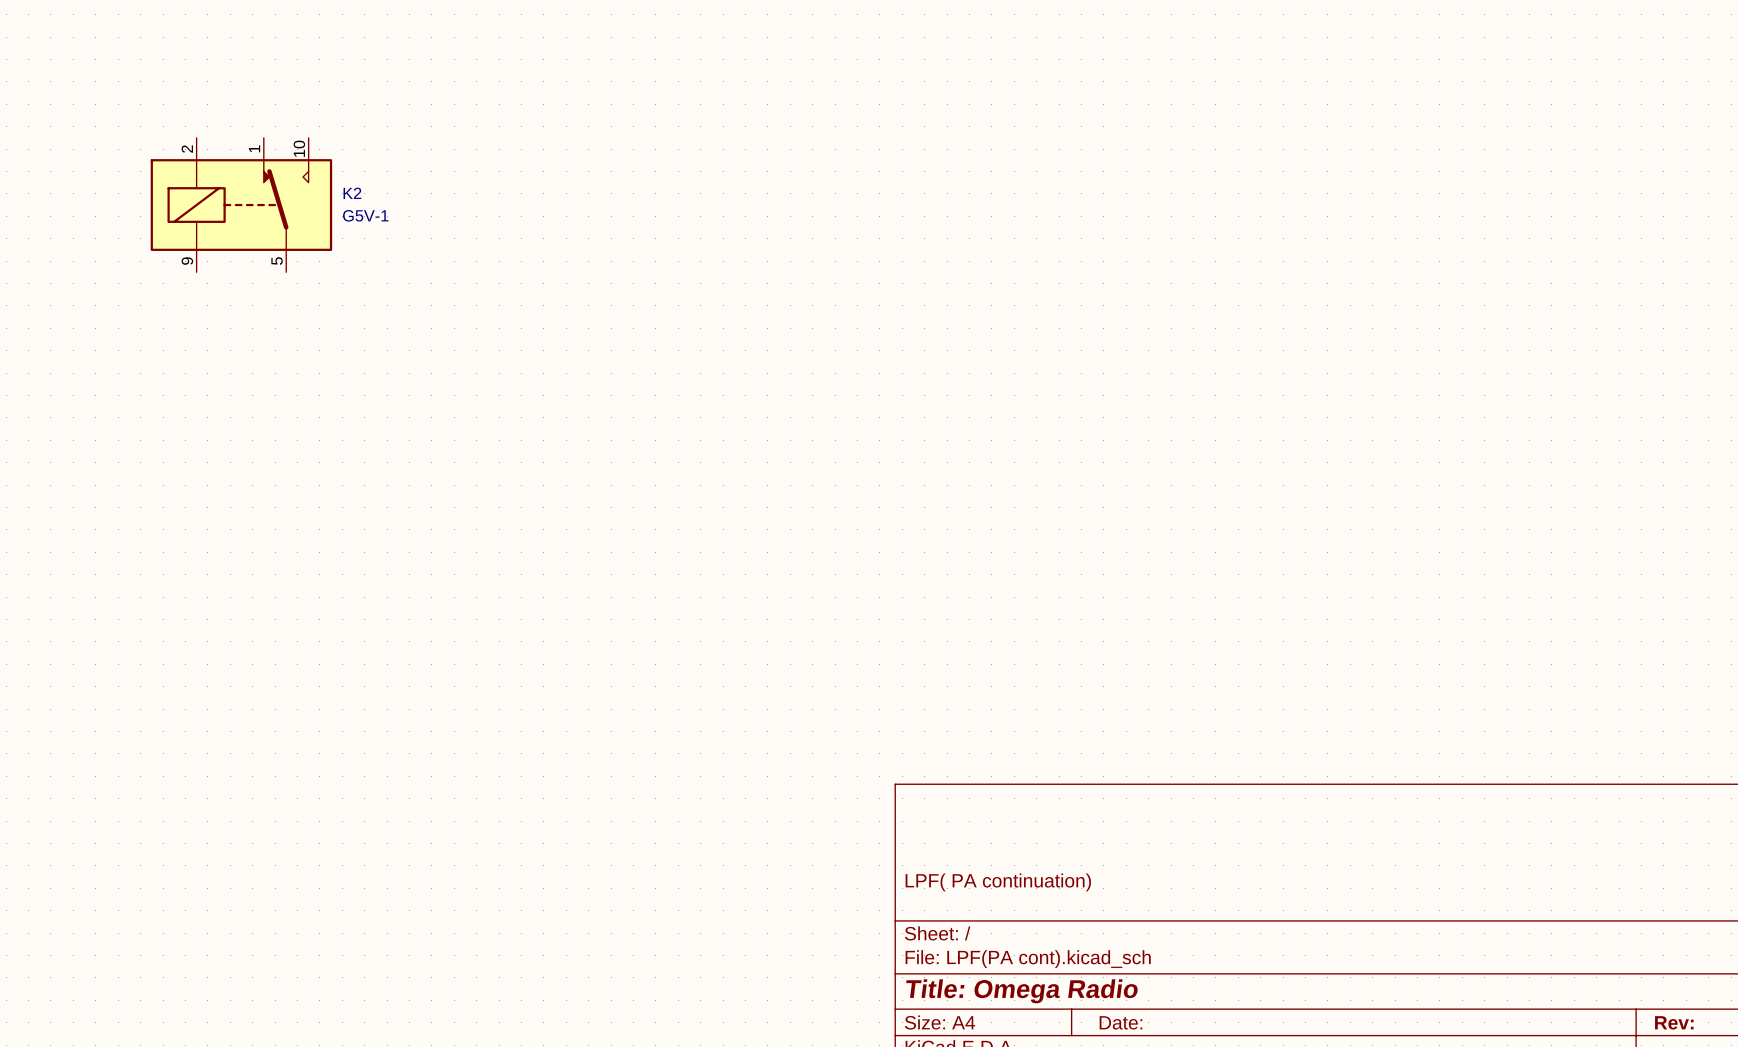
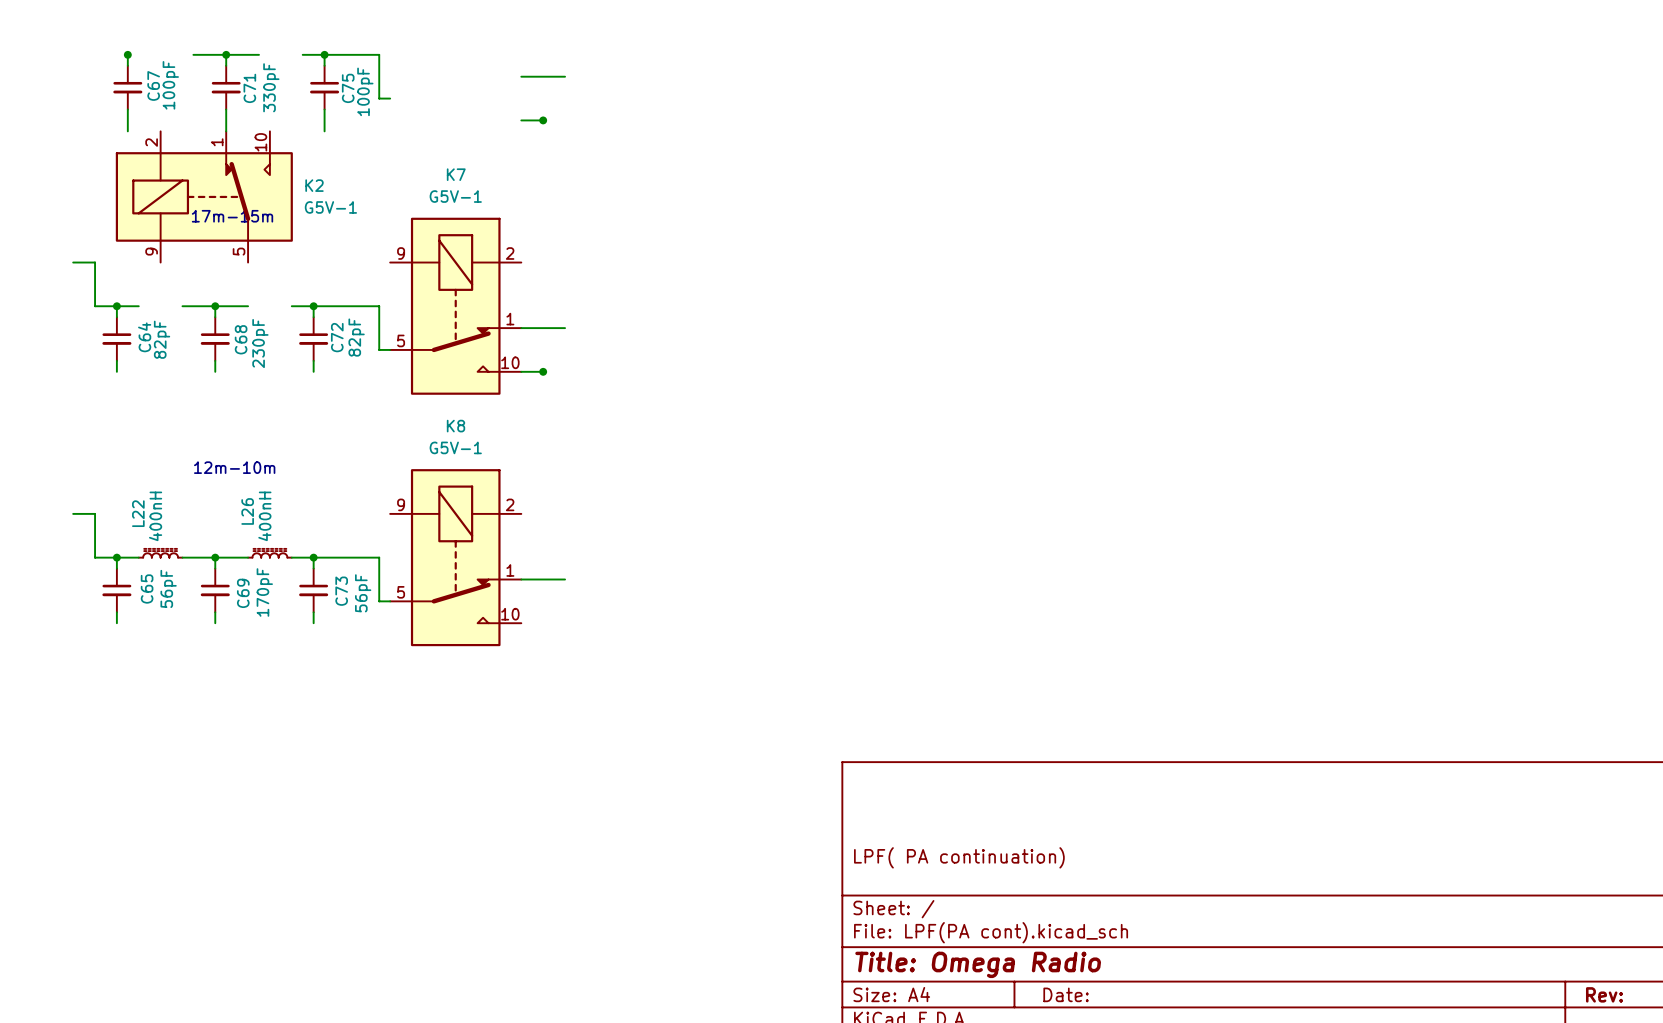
wire: none -> (127, 54) (127, 65)
junction: none -> (127, 54)
wire: none -> (193, 54) (258, 54)
wire: none -> (226, 54) (226, 65)
junction: none -> (226, 54)
wire: none -> (302, 54) (379, 54) (379, 98) (390, 98)
wire: none -> (324, 54) (324, 65)
junction: none -> (324, 54)
wire: none -> (521, 76) (565, 76)
C67: none -> 100pF (127, 87)
C71: none -> 330pF (226, 87)
C75: none -> 100pF (324, 87)
wire: none -> (127, 109) (127, 131)
wire: none -> (226, 109) (226, 131)
wire: none -> (324, 109) (324, 131)
wire: none -> (521, 120) (543, 120)
junction: none -> (543, 120)
text: none -> 17m-15m (232, 216)
wire: none -> (73, 262) (95, 262) (95, 306) (138, 306)
wire: none -> (116, 306) (116, 317)
junction: none -> (116, 306)
wire: none -> (182, 306) (248, 306)
wire: none -> (215, 306) (215, 317)
junction: none -> (215, 306)
wire: none -> (291, 306) (379, 306) (379, 349) (390, 349)
wire: none -> (313, 306) (313, 317)
junction: none -> (313, 306)
K7: none -> G5V-1 (455, 306)
wire: none -> (521, 328) (565, 328)
C64: none -> 82pF (116, 339)
C68: none -> 230pF (215, 339)
C72: none -> 82pF (313, 339)
wire: none -> (116, 360) (116, 371)
wire: none -> (215, 360) (215, 371)
wire: none -> (313, 360) (313, 371)
wire: none -> (521, 371) (543, 371)
junction: none -> (543, 371)
text: none -> 12m-10m (234, 467)
wire: none -> (73, 513) (95, 513) (95, 557) (138, 557)
L22: none -> 400nH (160, 553)
L26: none -> 400nH (269, 553)
wire: none -> (116, 557) (116, 568)
junction: none -> (116, 557)
wire: none -> (182, 557) (248, 557)
wire: none -> (215, 557) (215, 568)
junction: none -> (215, 557)
wire: none -> (291, 557) (379, 557) (379, 601) (390, 601)
wire: none -> (313, 557) (313, 568)
junction: none -> (313, 557)
K8: none -> G5V-1 (455, 557)
wire: none -> (521, 579) (565, 579)
C65: none -> 56pF (116, 590)
C69: none -> 170pF (215, 590)
C73: none -> 56pF (313, 590)
wire: none -> (116, 612) (116, 623)
wire: none -> (215, 612) (215, 623)
wire: none -> (313, 612) (313, 623)

